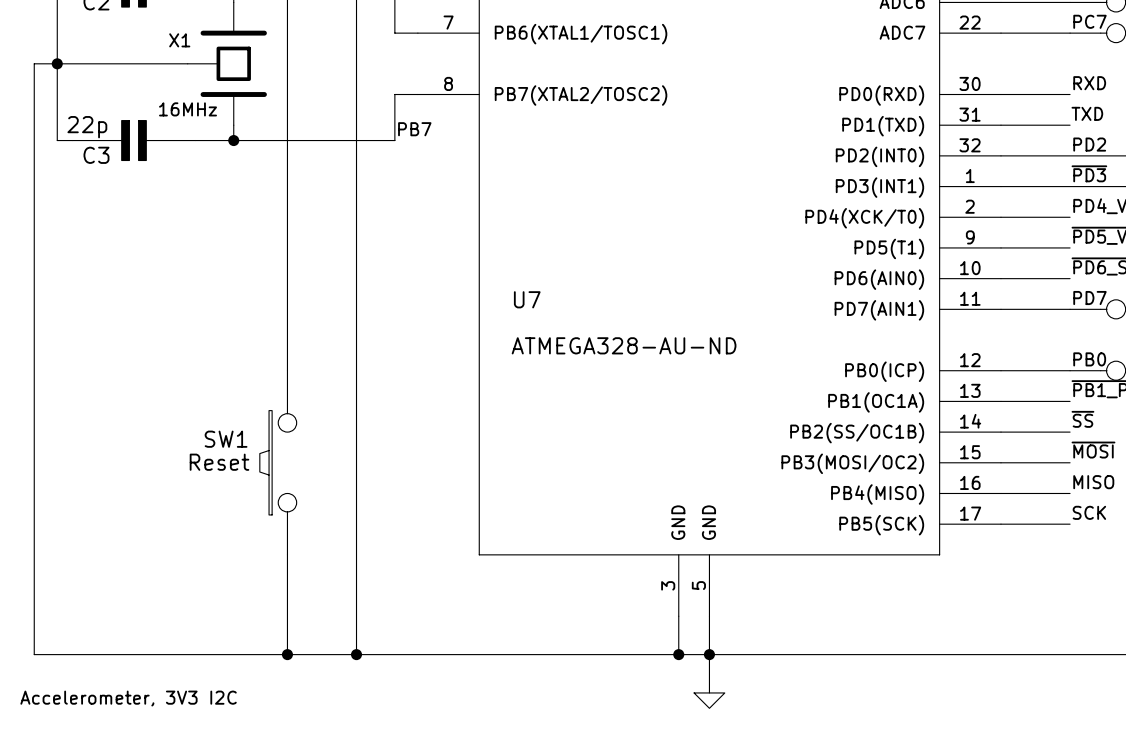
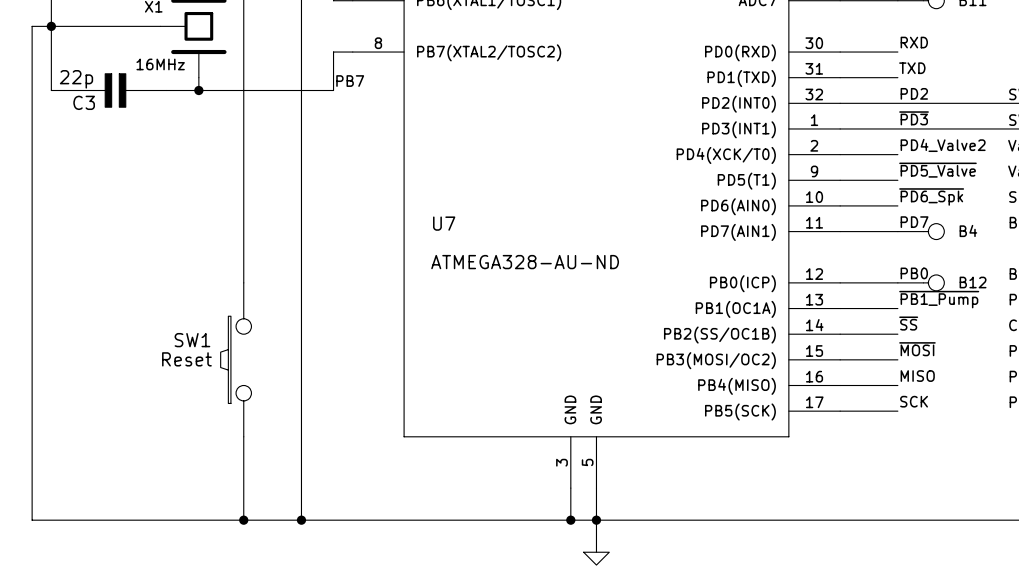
text: Accelerometer, 3V3 I2C (128, 698) -> none

